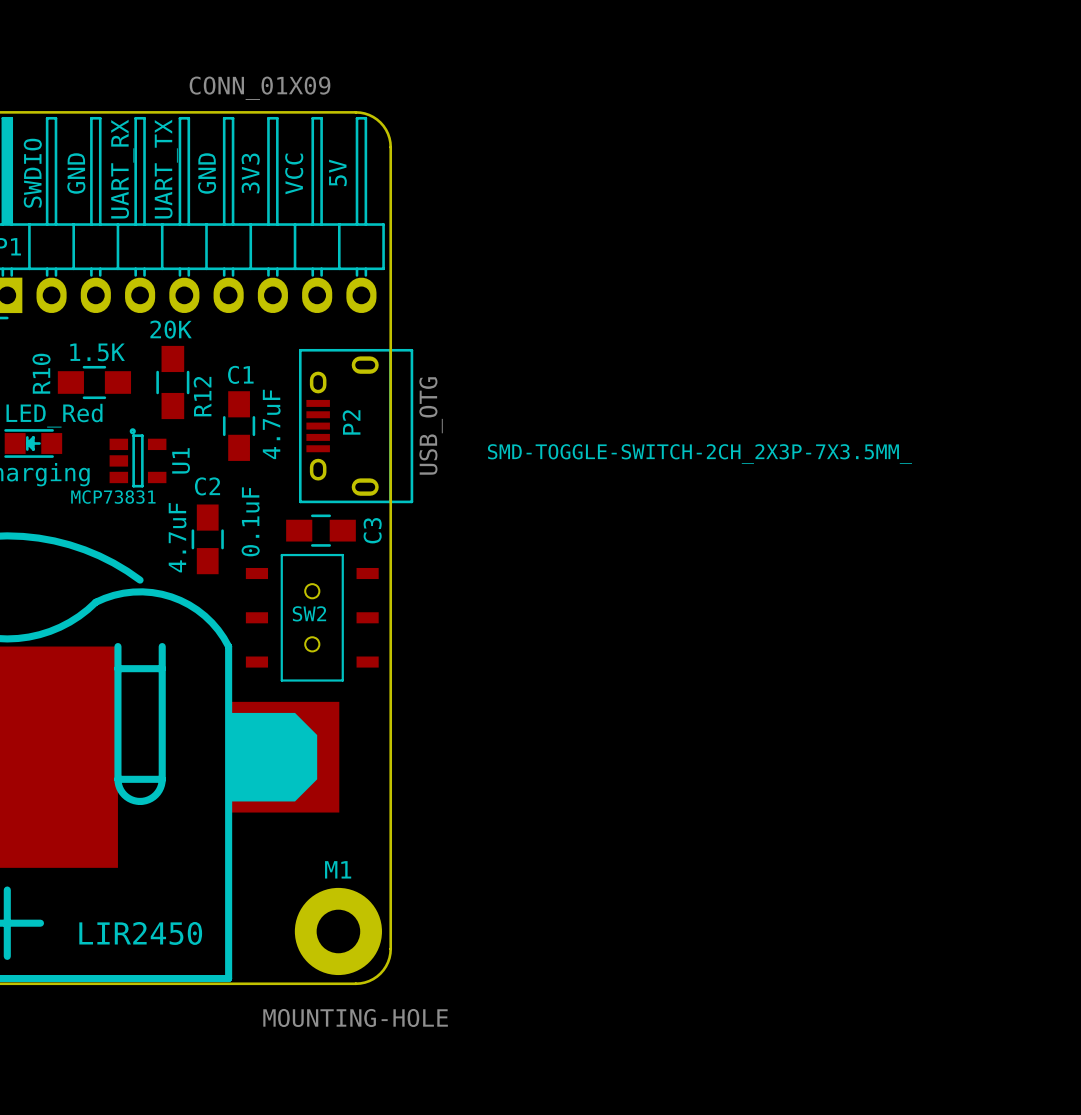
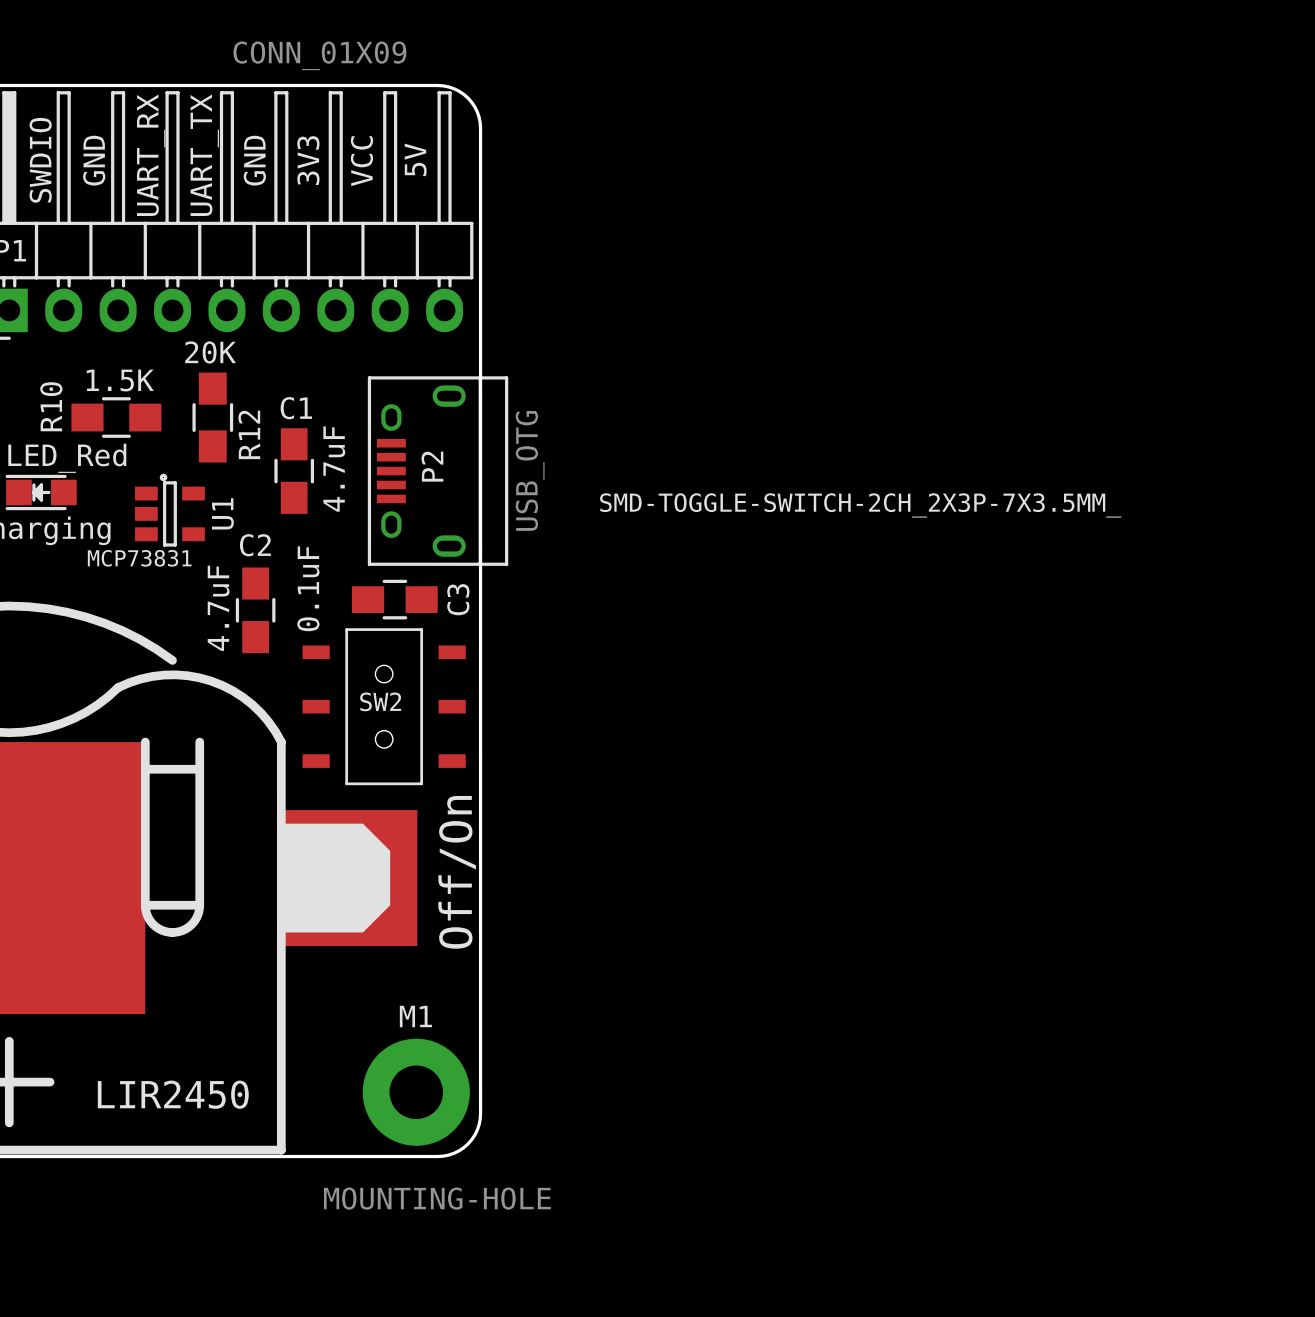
text: none -> Off/On (457, 872)

